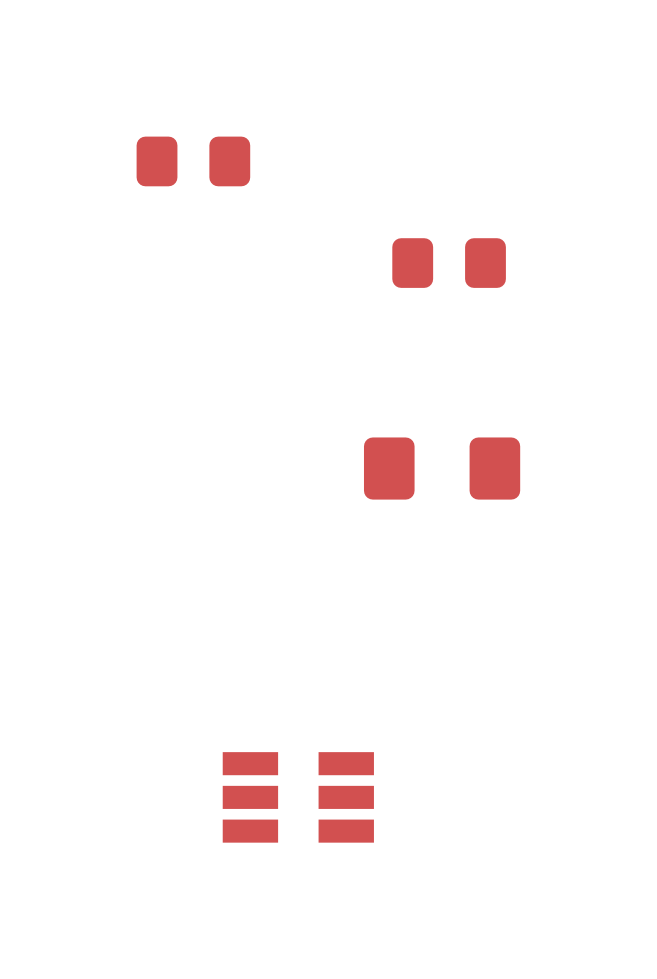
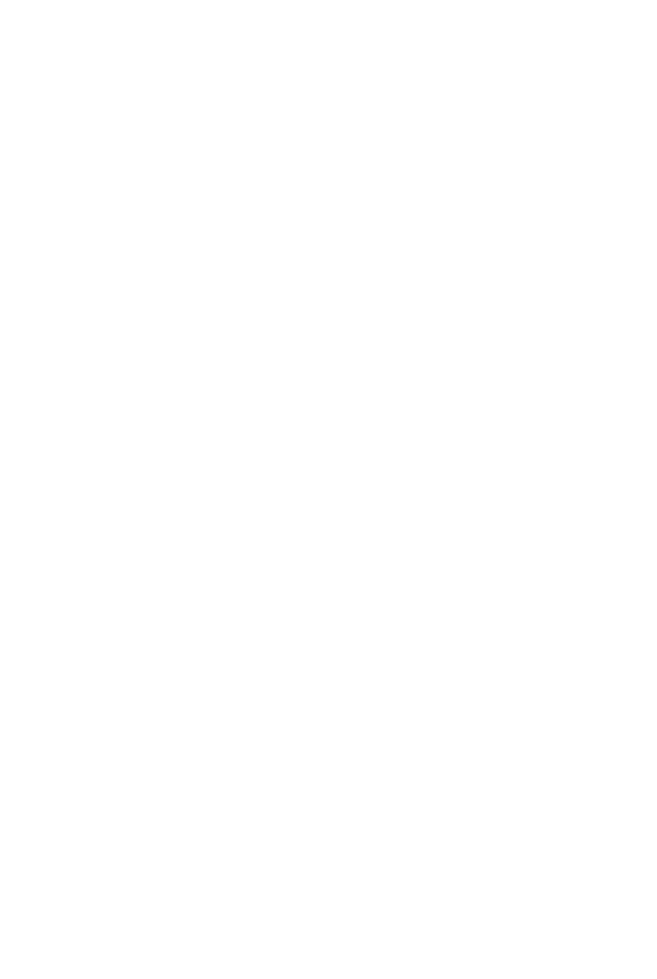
part: (193, 161) -> none
part: (449, 263) -> none
part: (442, 468) -> none
part: (298, 797) -> none

